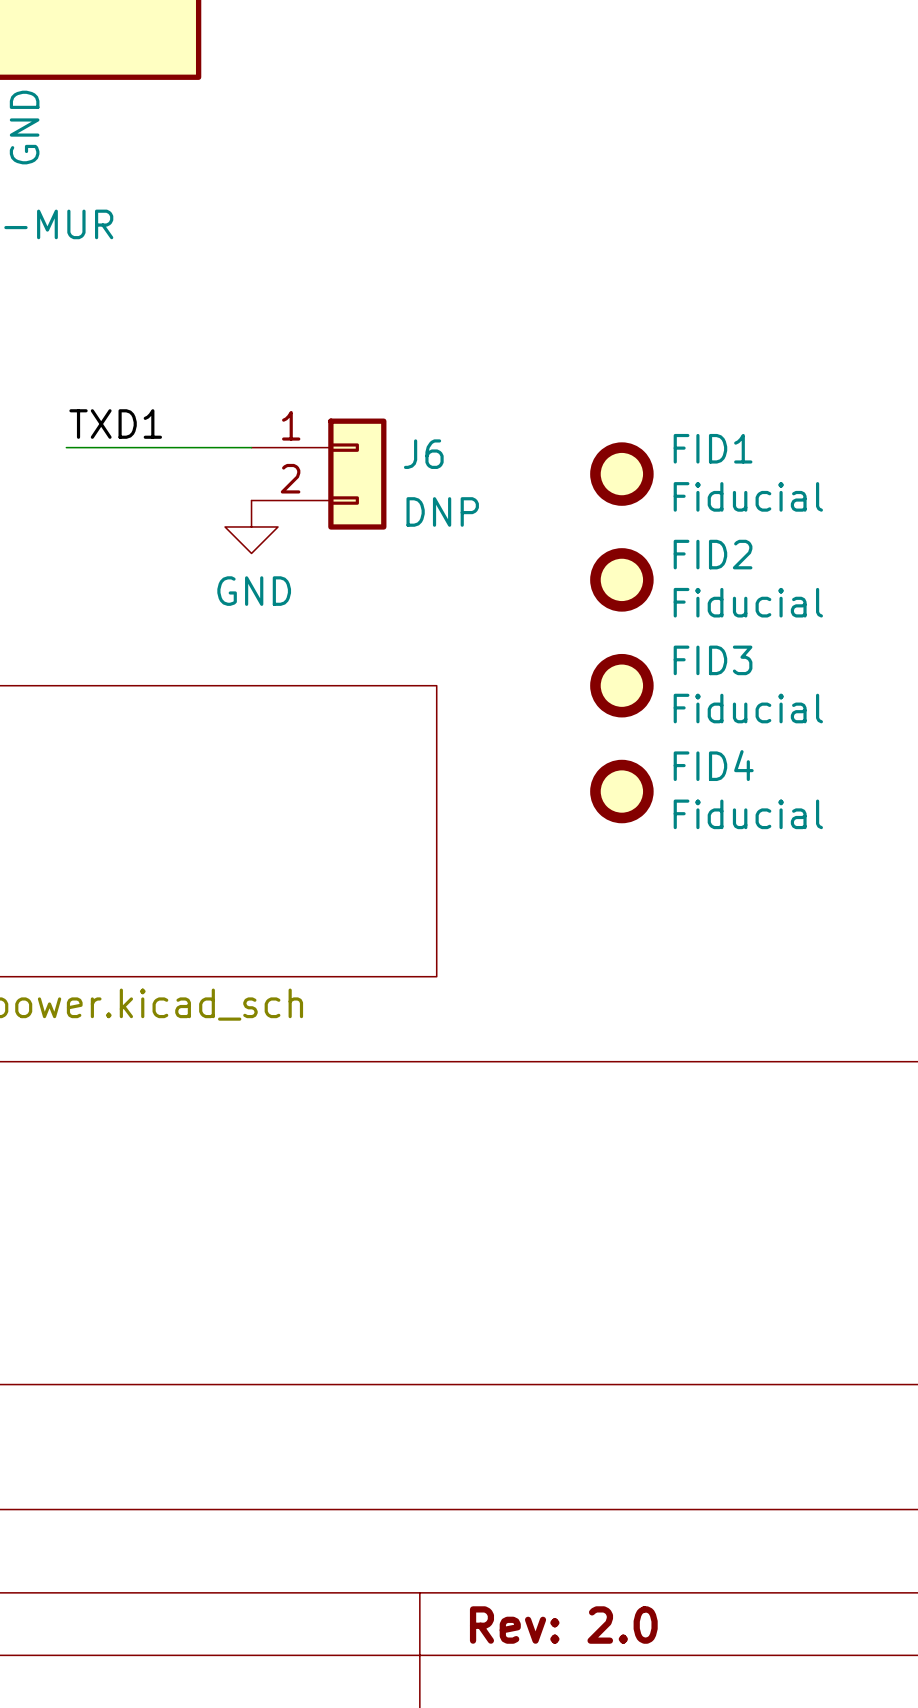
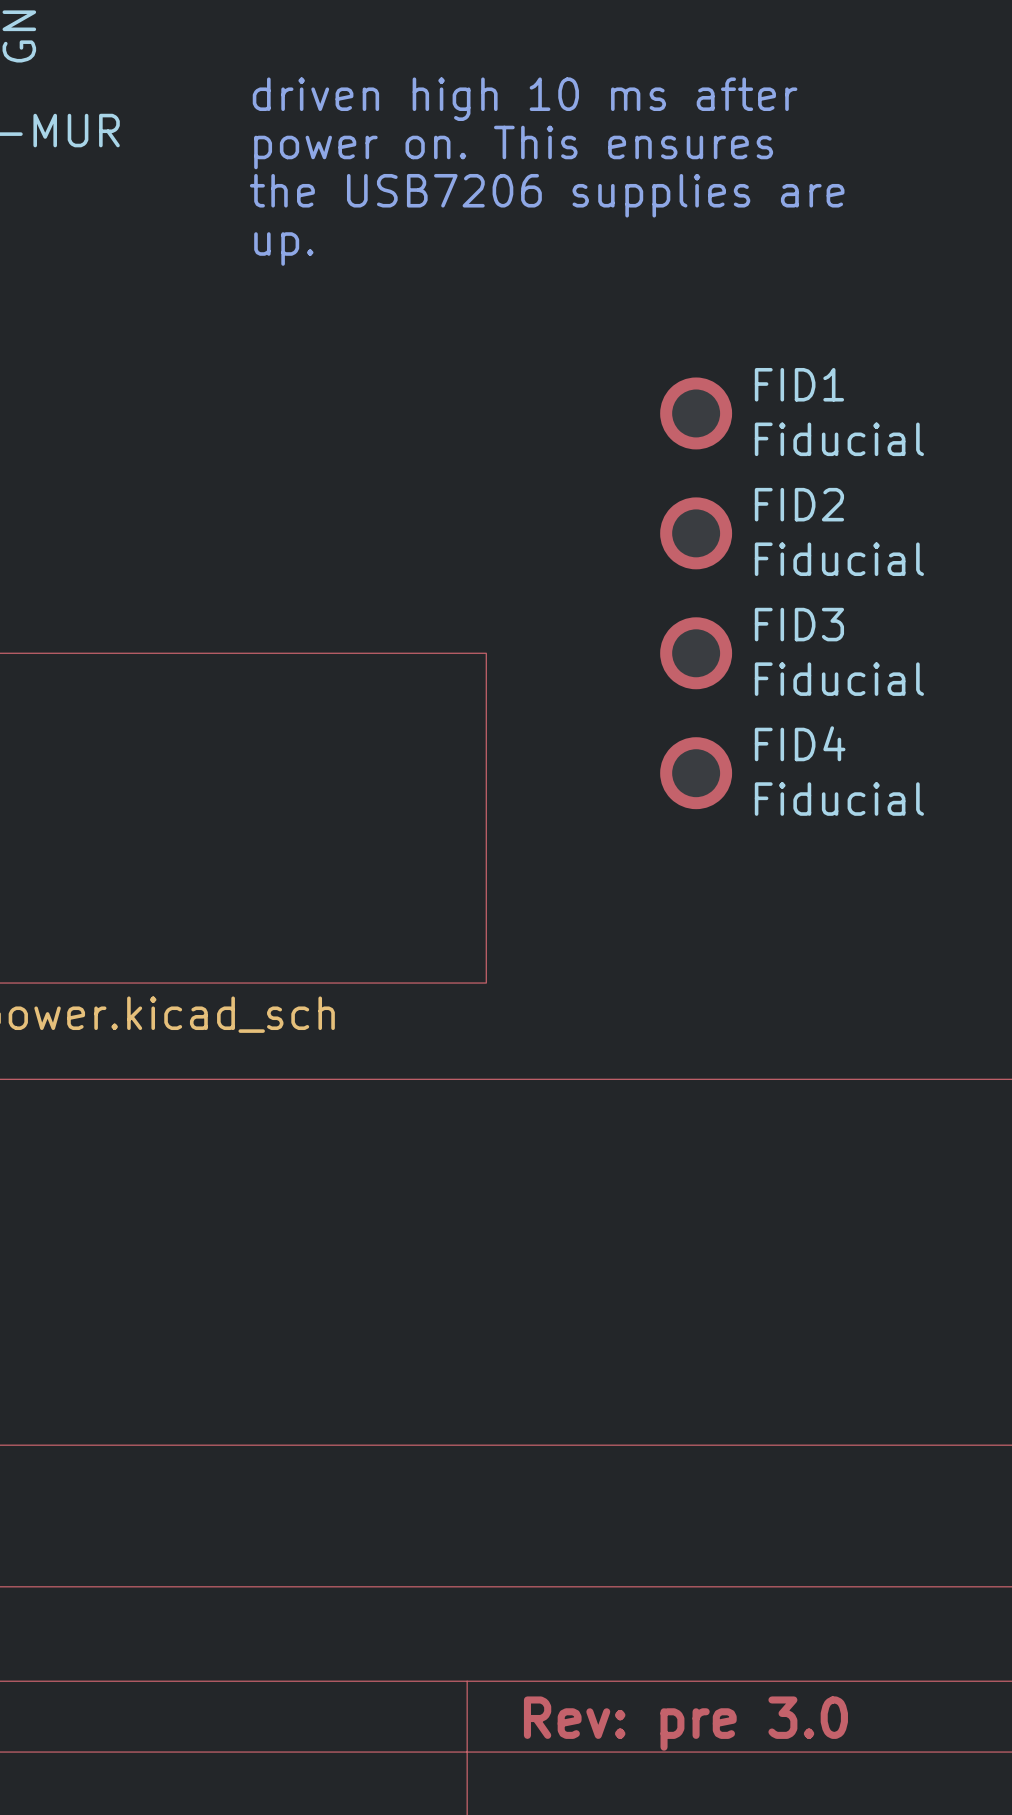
text: none -> driven high 10 ms after (525, 99)
text: none -> power on. This ensures (513, 147)
text: none -> the USB7206 supplies are (547, 195)
text: none -> up. (283, 249)
label: TXD1 (115, 424) -> none
wire: (66, 447) (251, 447) -> none
J6: DNP (318, 474) -> none
power symbol: GND (251, 526) -> none
title block: Rev: 2.0 (563, 1625) -> Rev: pre 3.0 (685, 1723)

